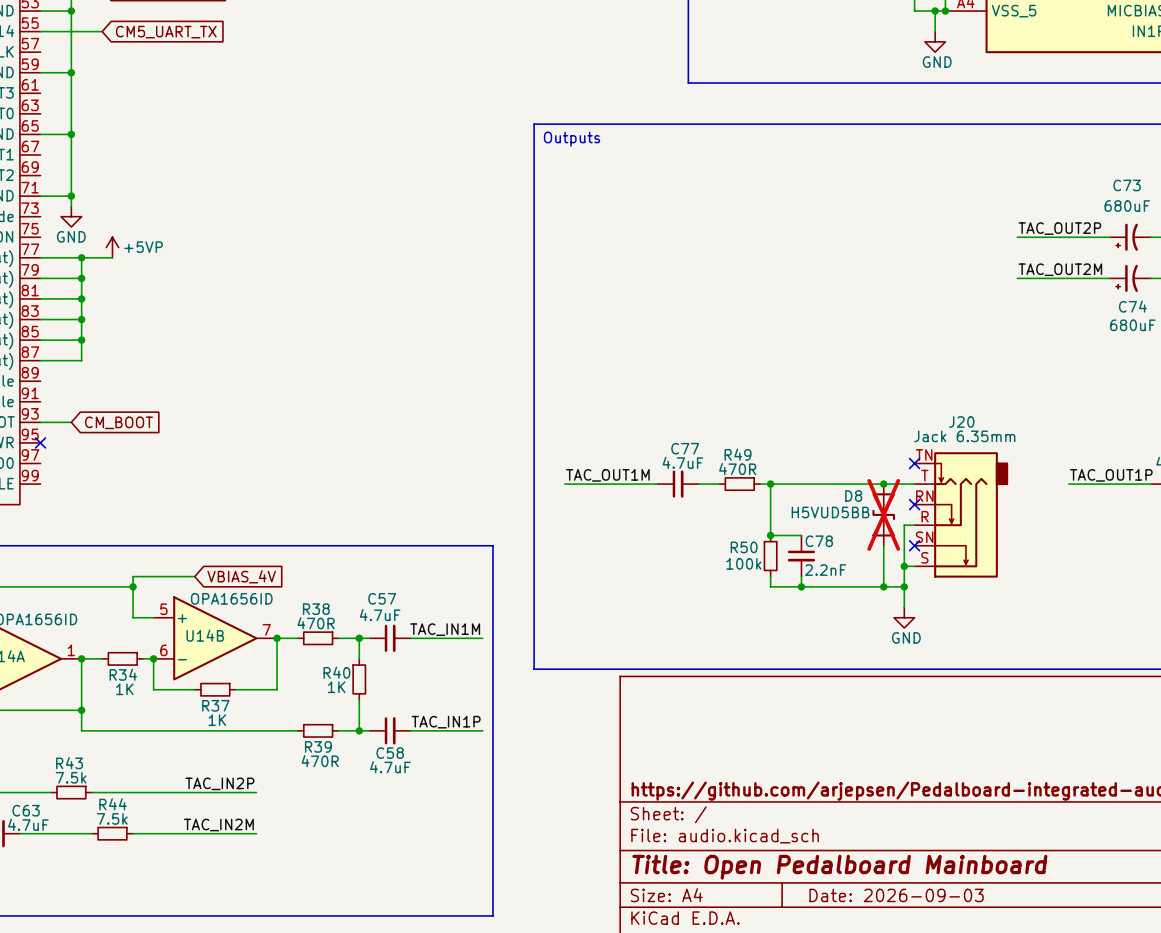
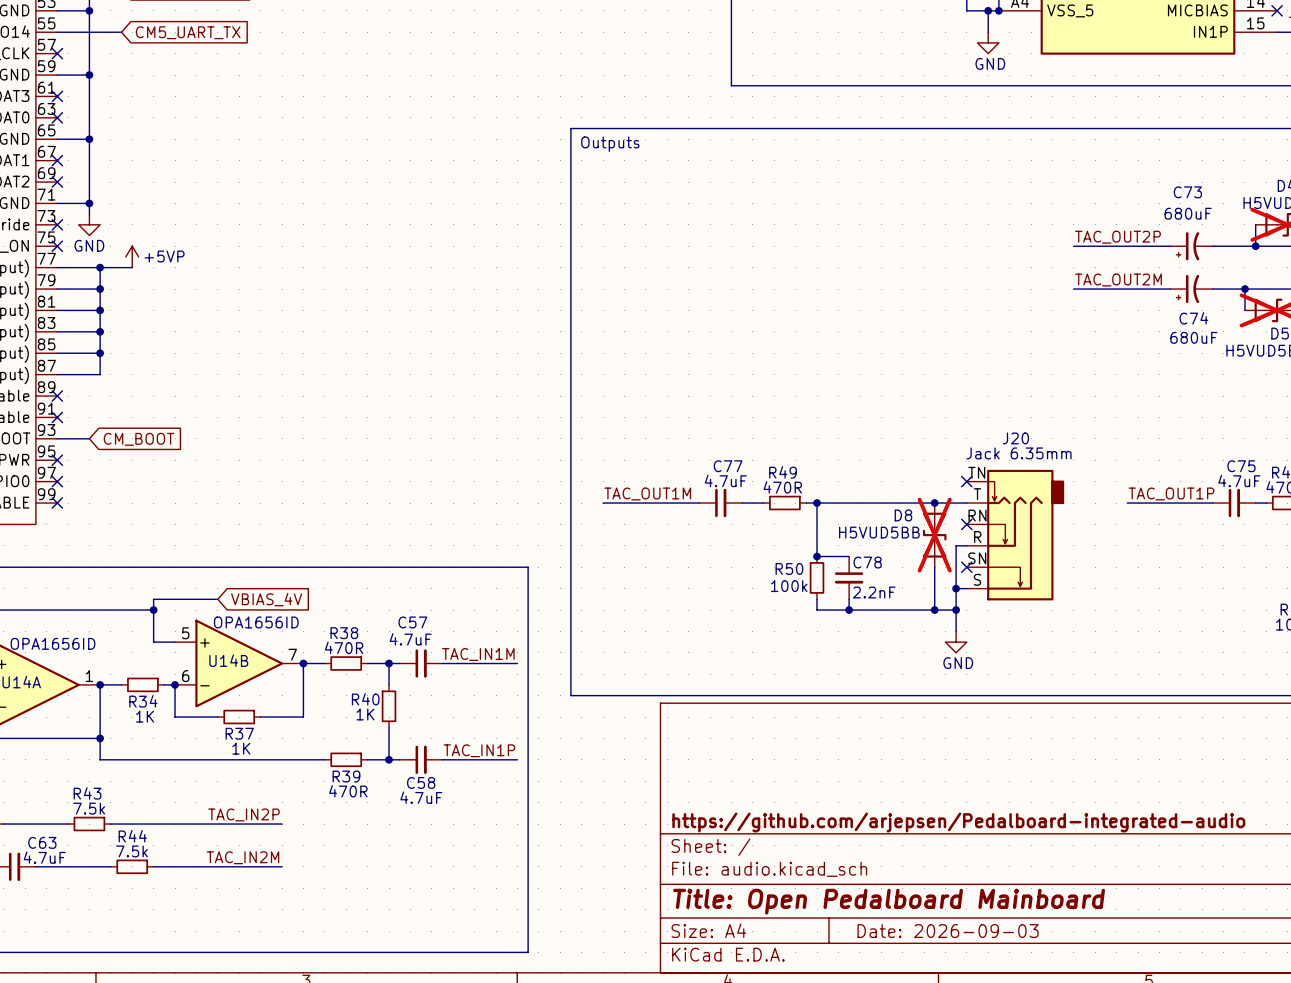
no-connect mark: none -> (57, 53)
no-connect mark: none -> (57, 96)
no-connect mark: none -> (57, 117)
no-connect mark: none -> (57, 160)
no-connect mark: none -> (57, 182)
no-connect mark: none -> (57, 224)
no-connect mark: none -> (57, 246)
no-connect mark: none -> (57, 396)
no-connect mark: none -> (57, 417)
no-connect mark: none -> (57, 481)
no-connect mark: none -> (57, 503)

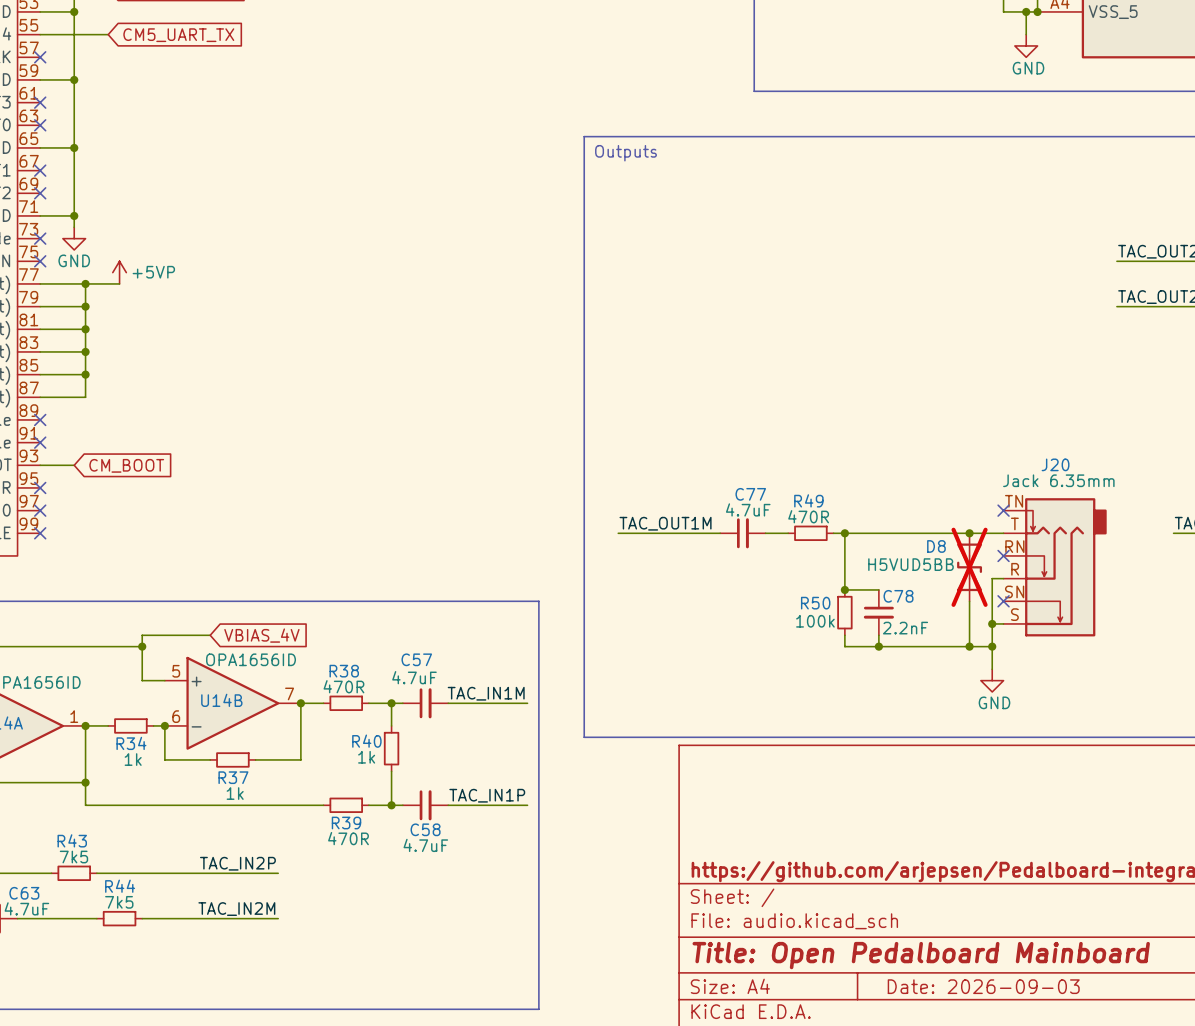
R40 value: 1K (365, 714) -> 1k (366, 757)
R34 value: 1K (145, 716) -> 1k (133, 759)
R37 value: 1K (241, 748) -> 1k (235, 793)
R43 value: 7.5k (89, 808) -> 7k5 (73, 857)
R44 value: 7.5k (131, 851) -> 7k5 (119, 902)

